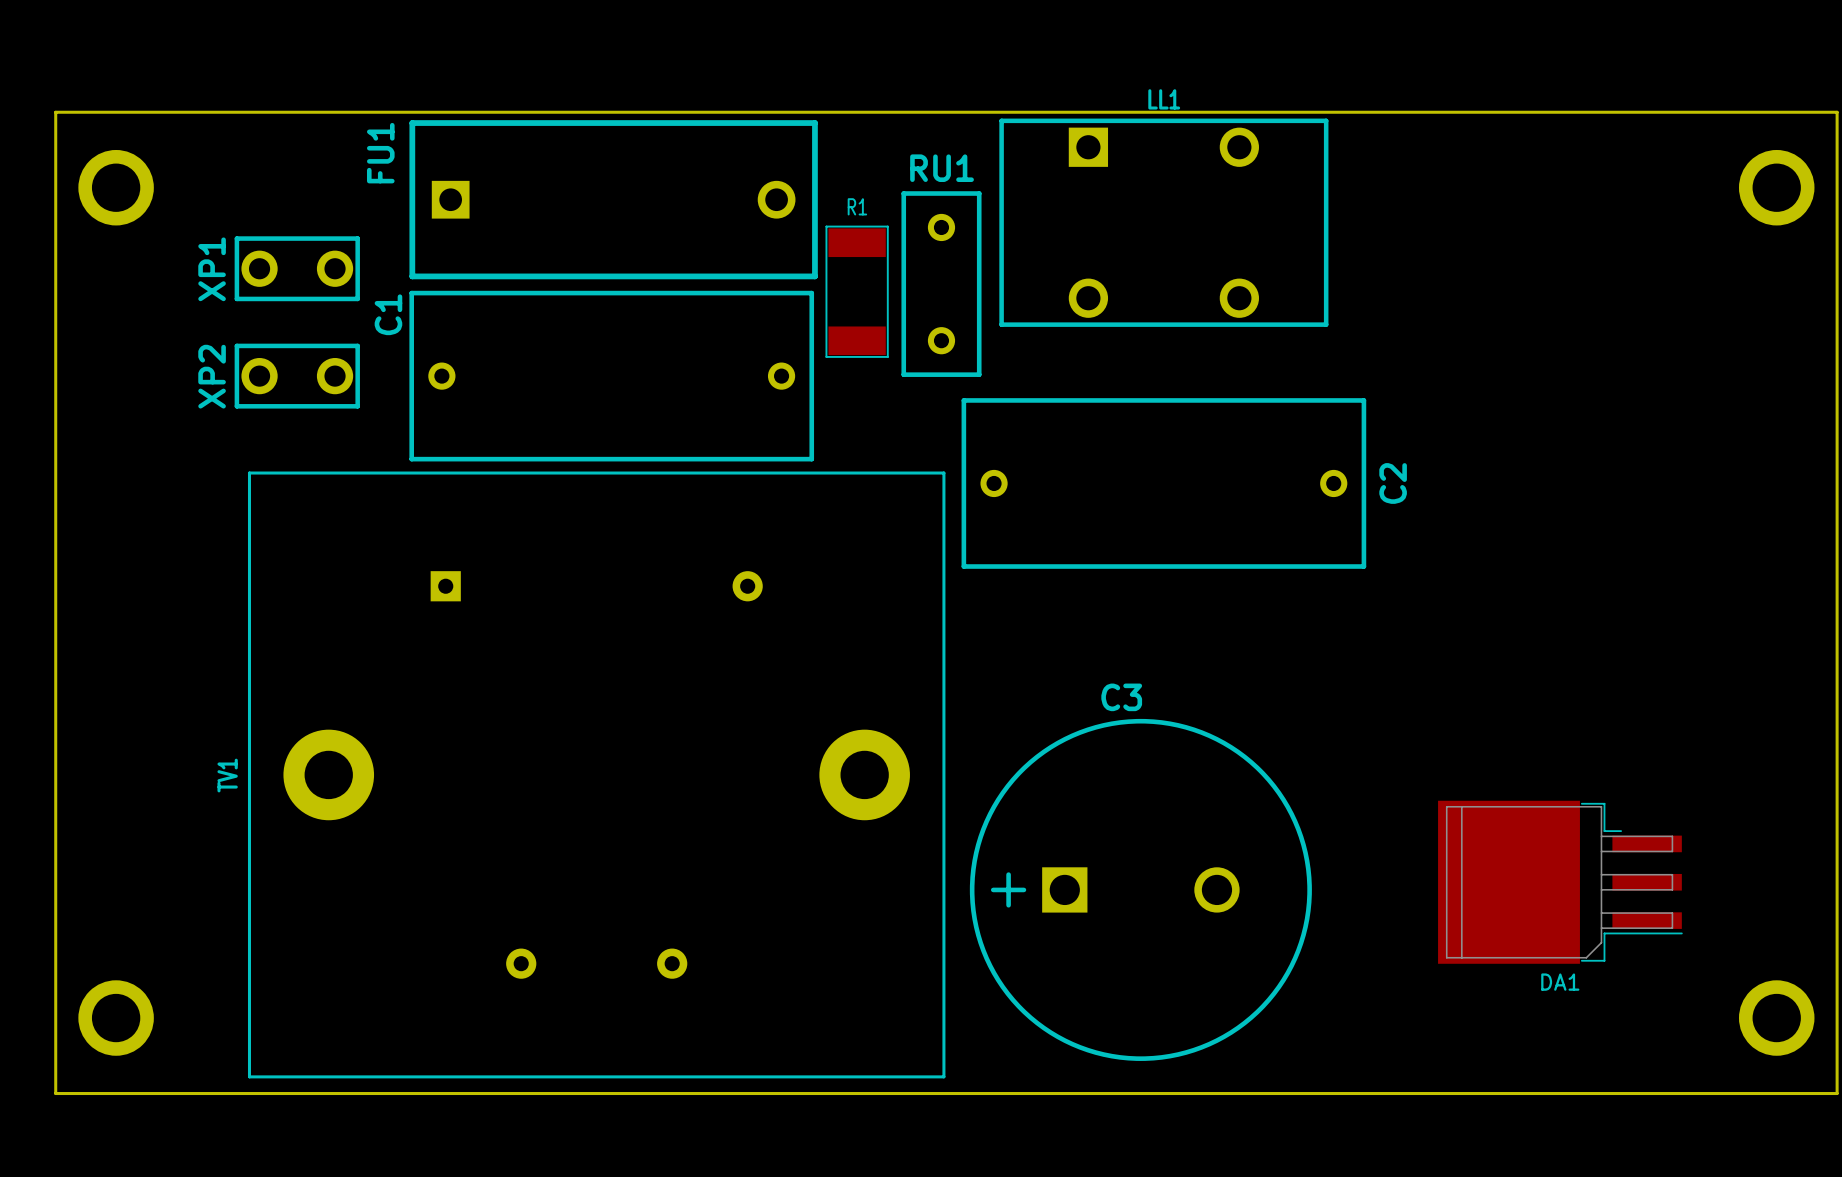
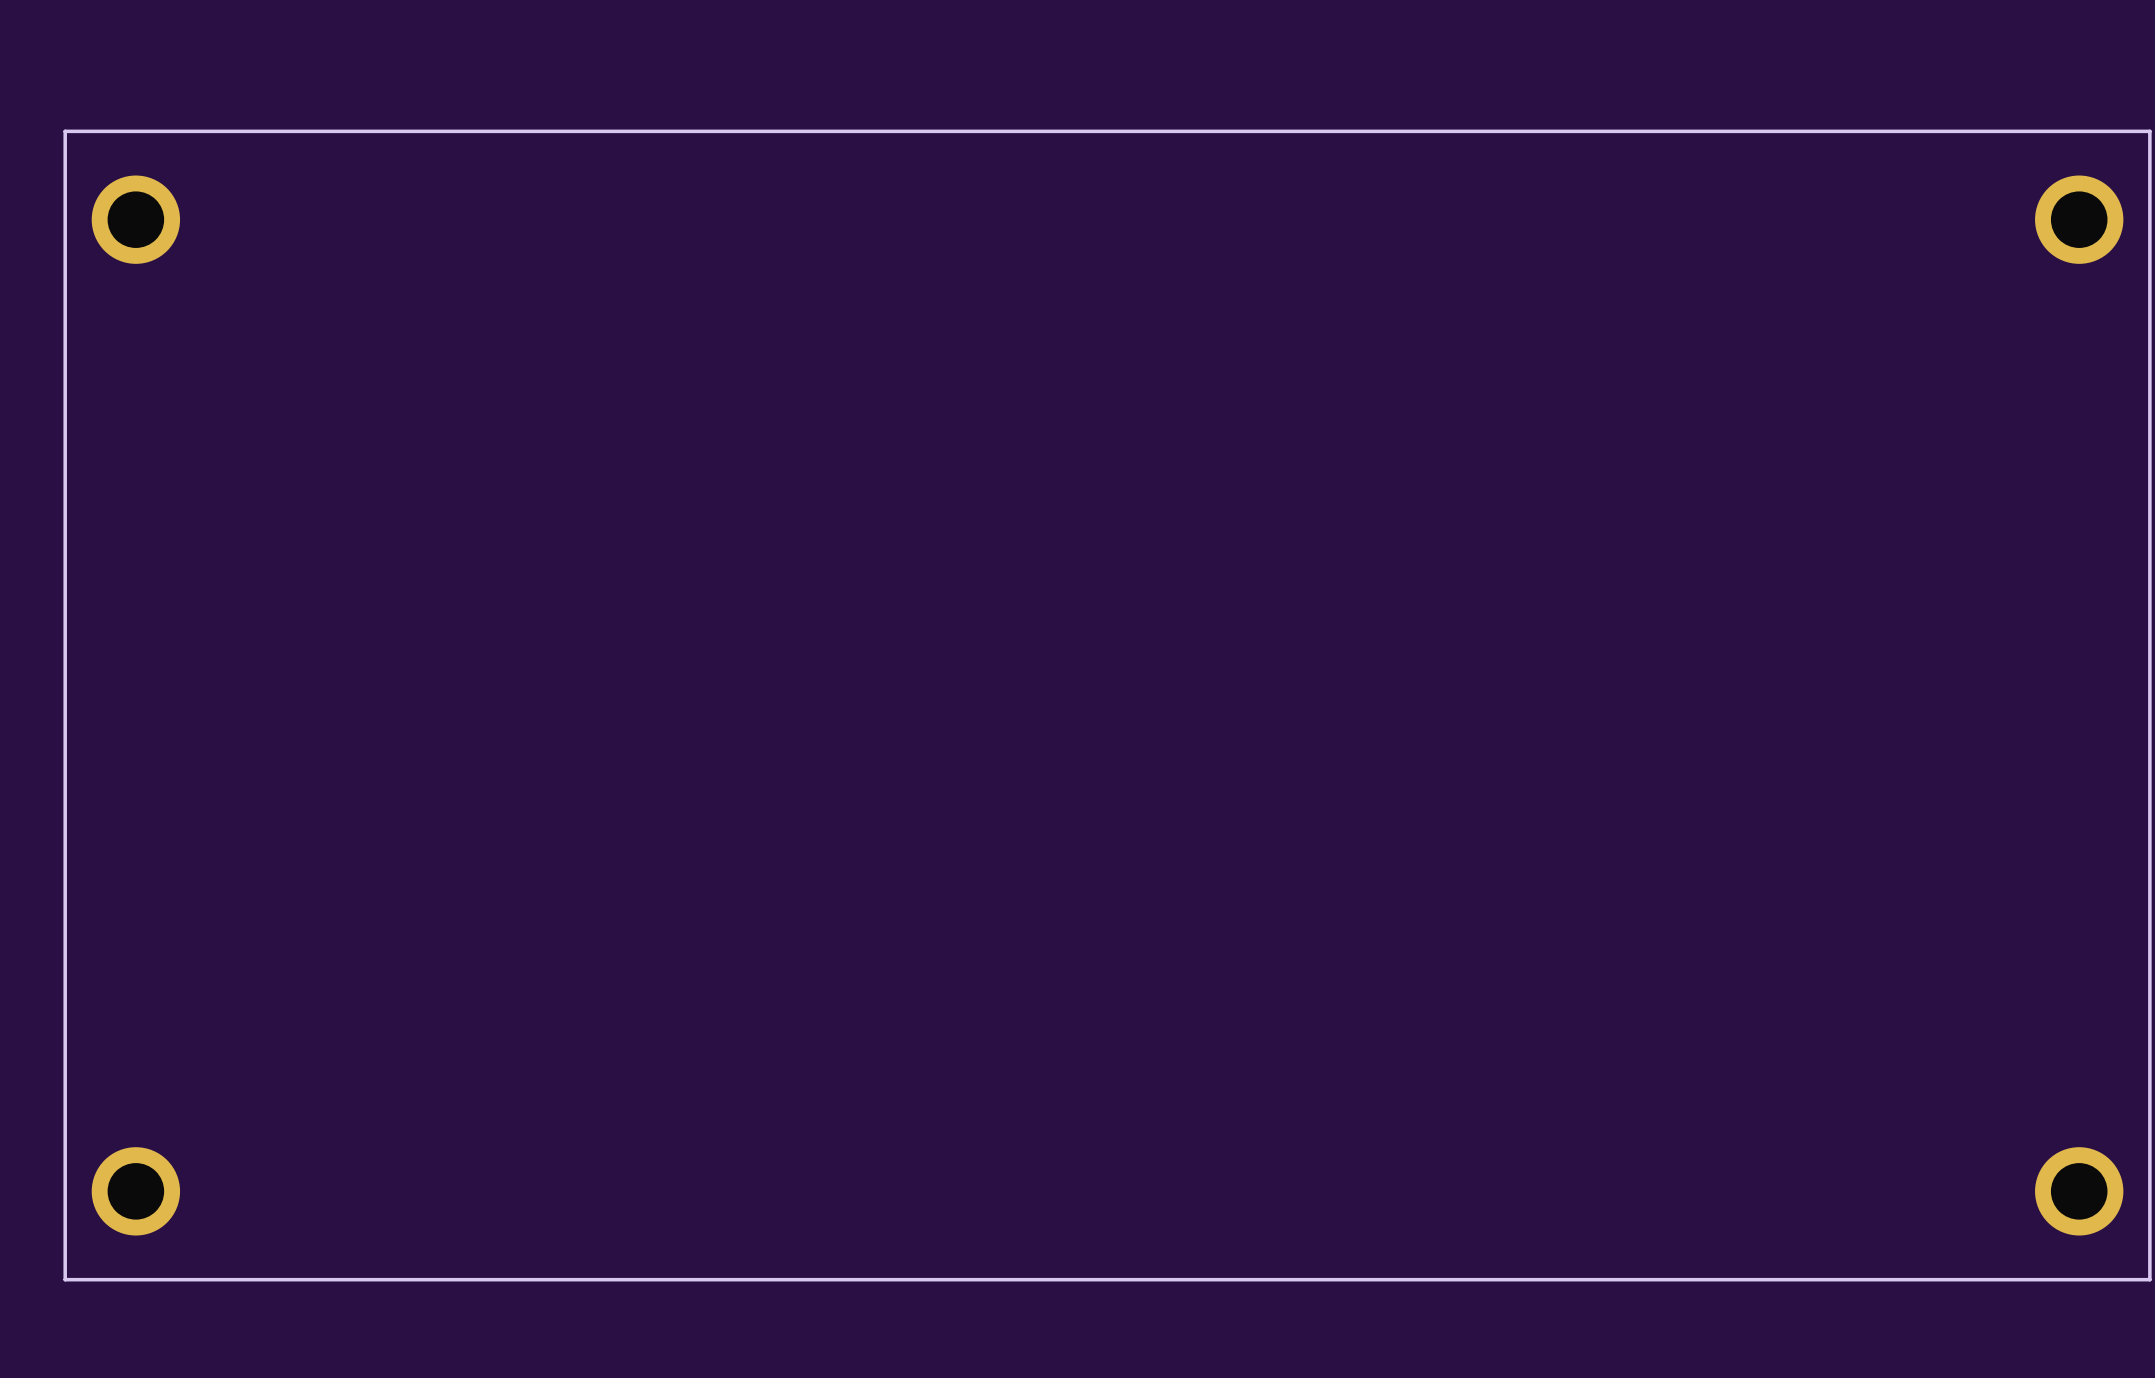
FU1: (613, 199) -> none
LL1: (1163, 222) -> none
XP1: (297, 268) -> none
RU1: (941, 284) -> none
R1: (857, 291) -> none
XP2: (297, 376) -> none
C1: (611, 376) -> none
C2: (1163, 483) -> none
TV1: (596, 774) -> none
DA1: (1560, 882) -> none
C3: (1140, 889) -> none

